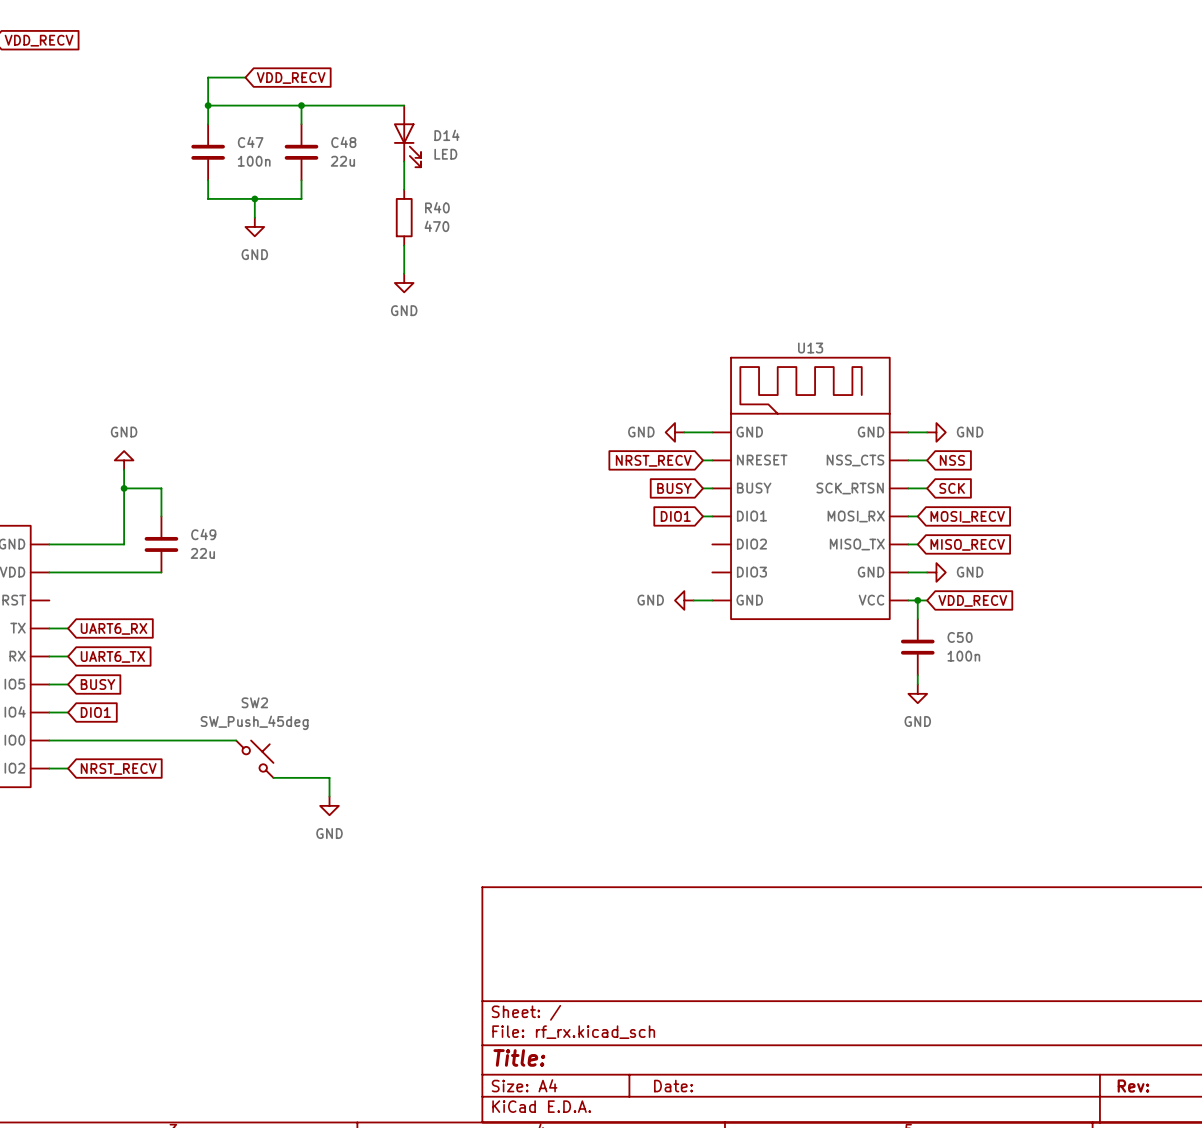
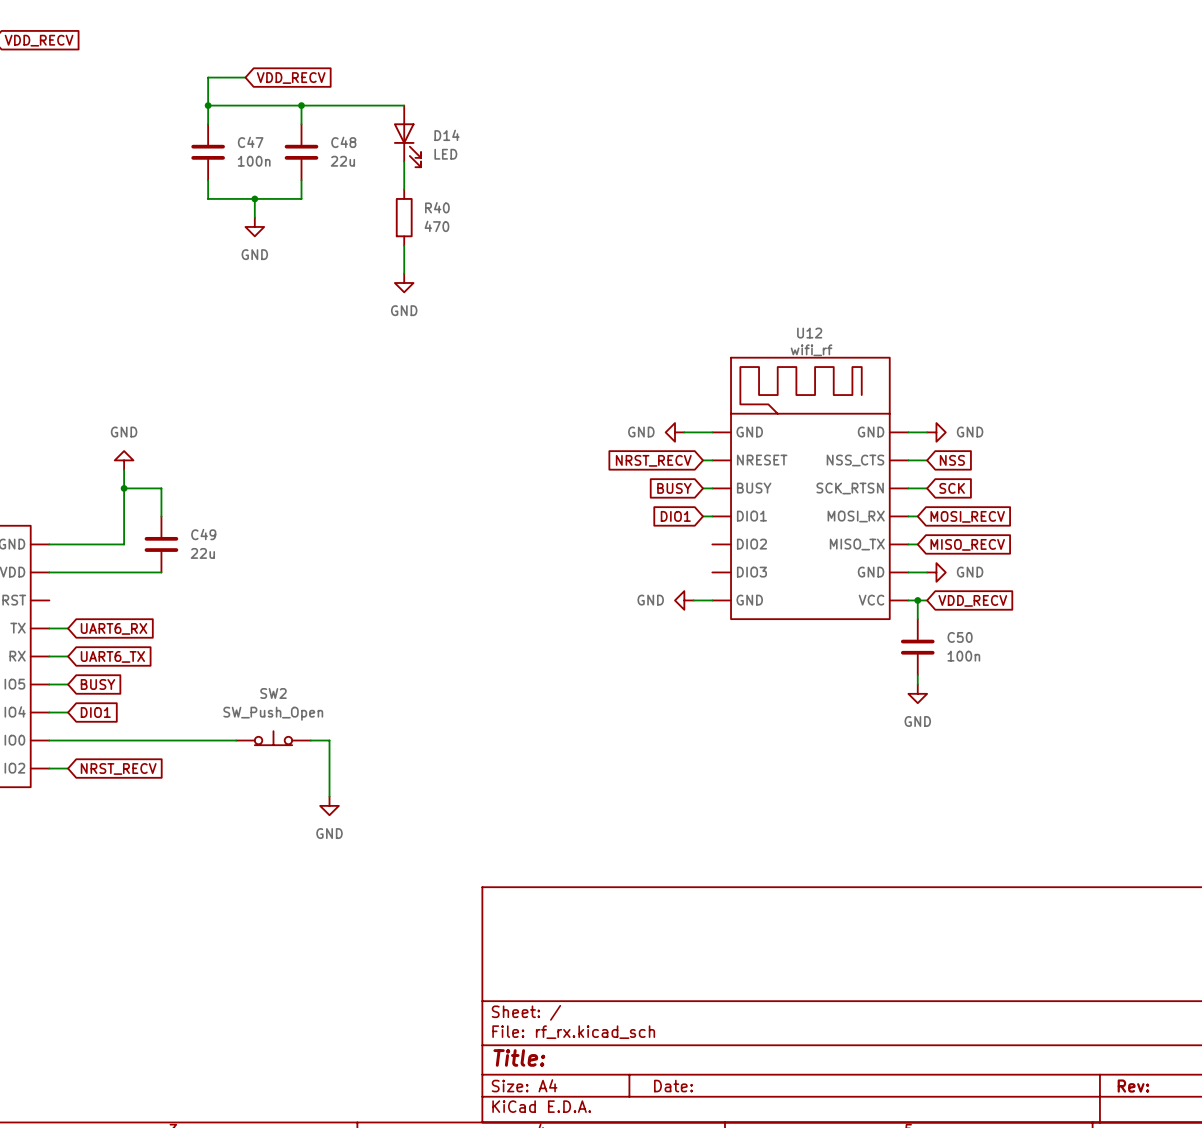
U13 name: U13 (810, 348) -> U12 (809, 333)
U13 value: none -> wifi_rf (811, 350)
SW2 value: SW_Push_45deg (254, 722) -> SW_Push_Open (273, 713)
SW2 symbol: [236, 740, 274, 778] -> [236, 731, 311, 746]
wire: (273, 777) (329, 777) -> (310, 740) (329, 740) (329, 777)

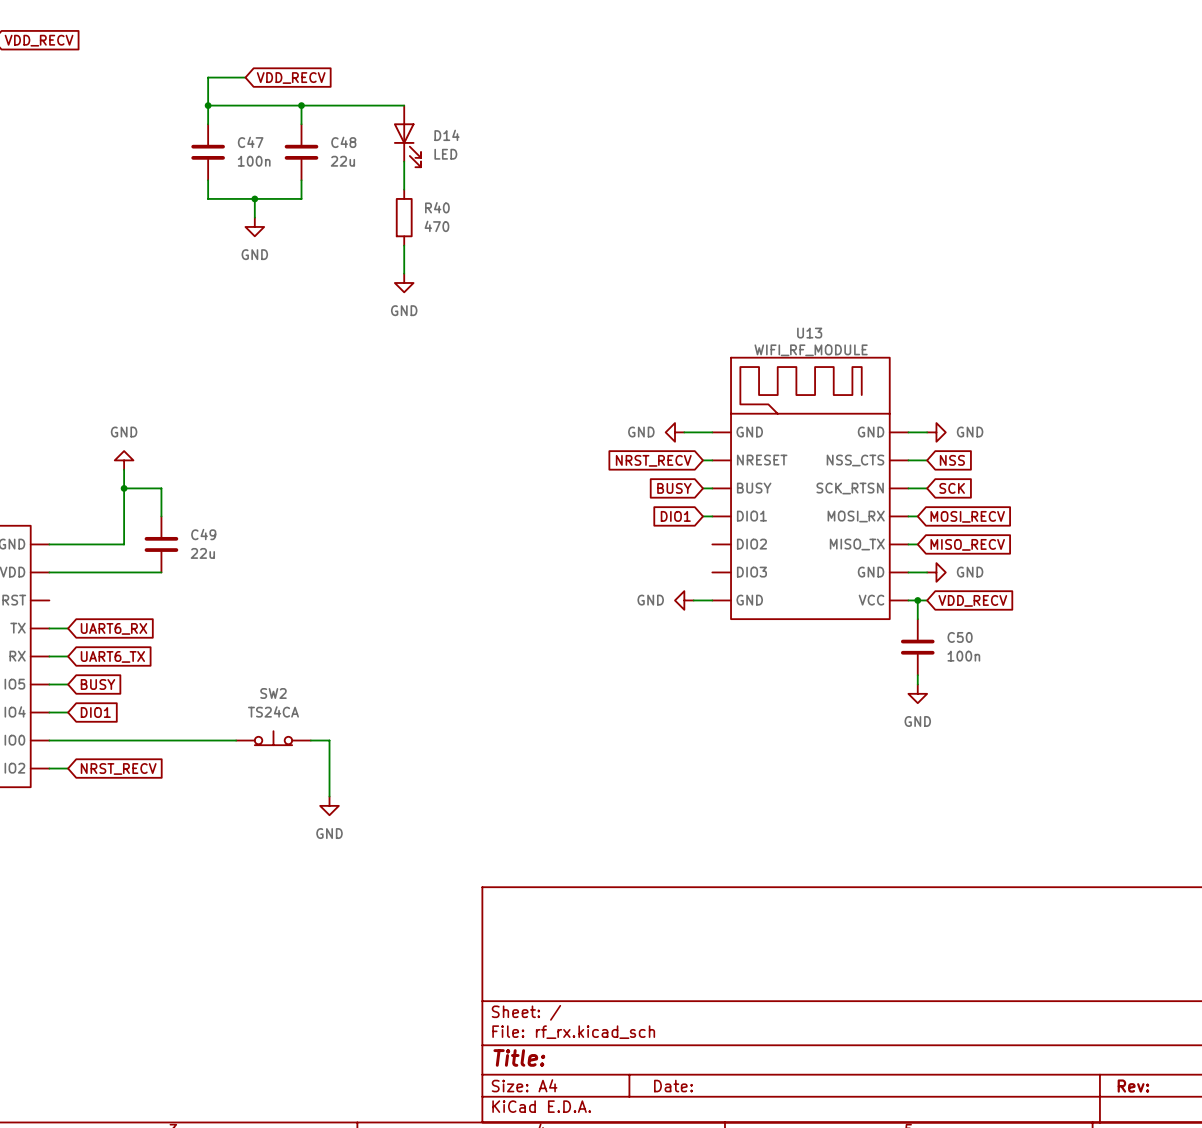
U12 name: U12 (809, 333) -> U13 (809, 333)
U12 value: wifi_rf (811, 350) -> WIFI_RF_MODULE (811, 350)
SW2 value: SW_Push_Open (273, 713) -> TS24CA (273, 711)

